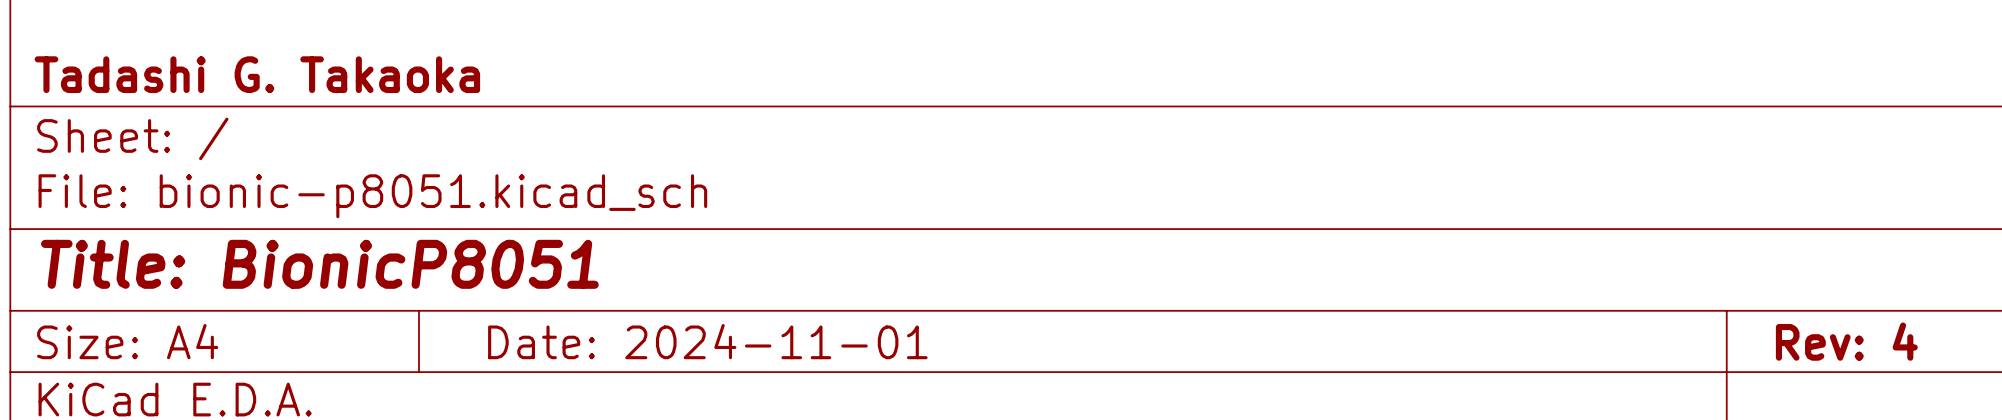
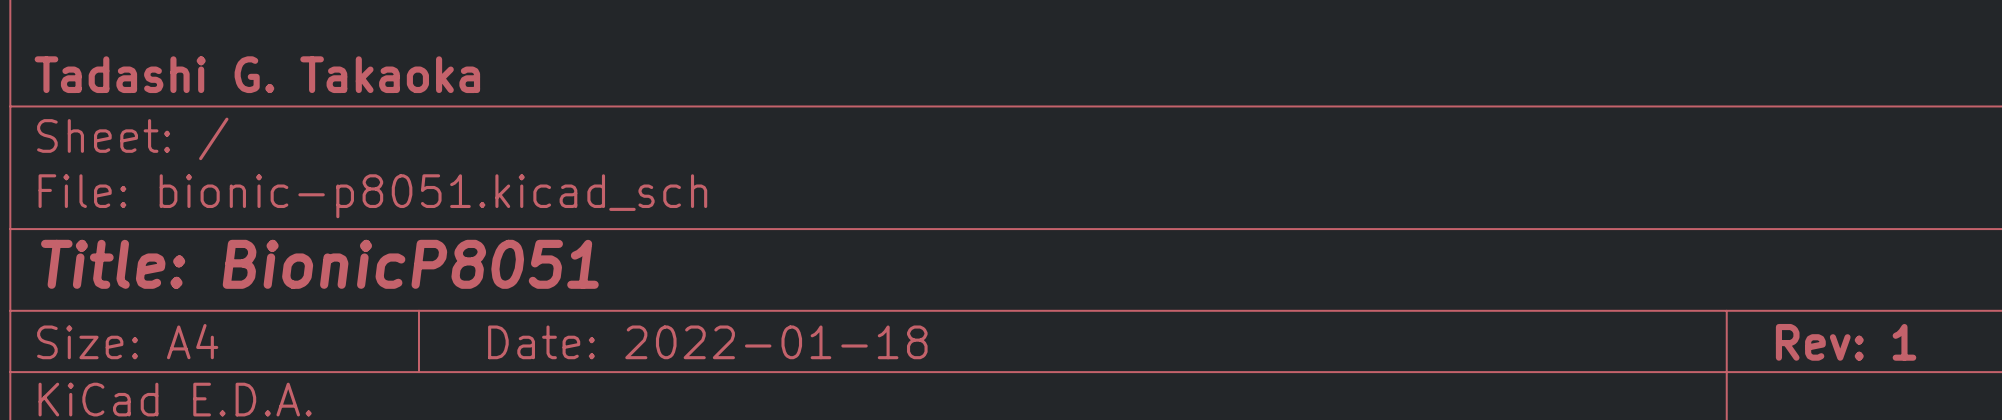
title block: Date: 2024-11-01 (707, 341) -> Date: 2022-01-18 (707, 342)
title block: Rev: 4 (1846, 341) -> Rev: 1 (1846, 342)

